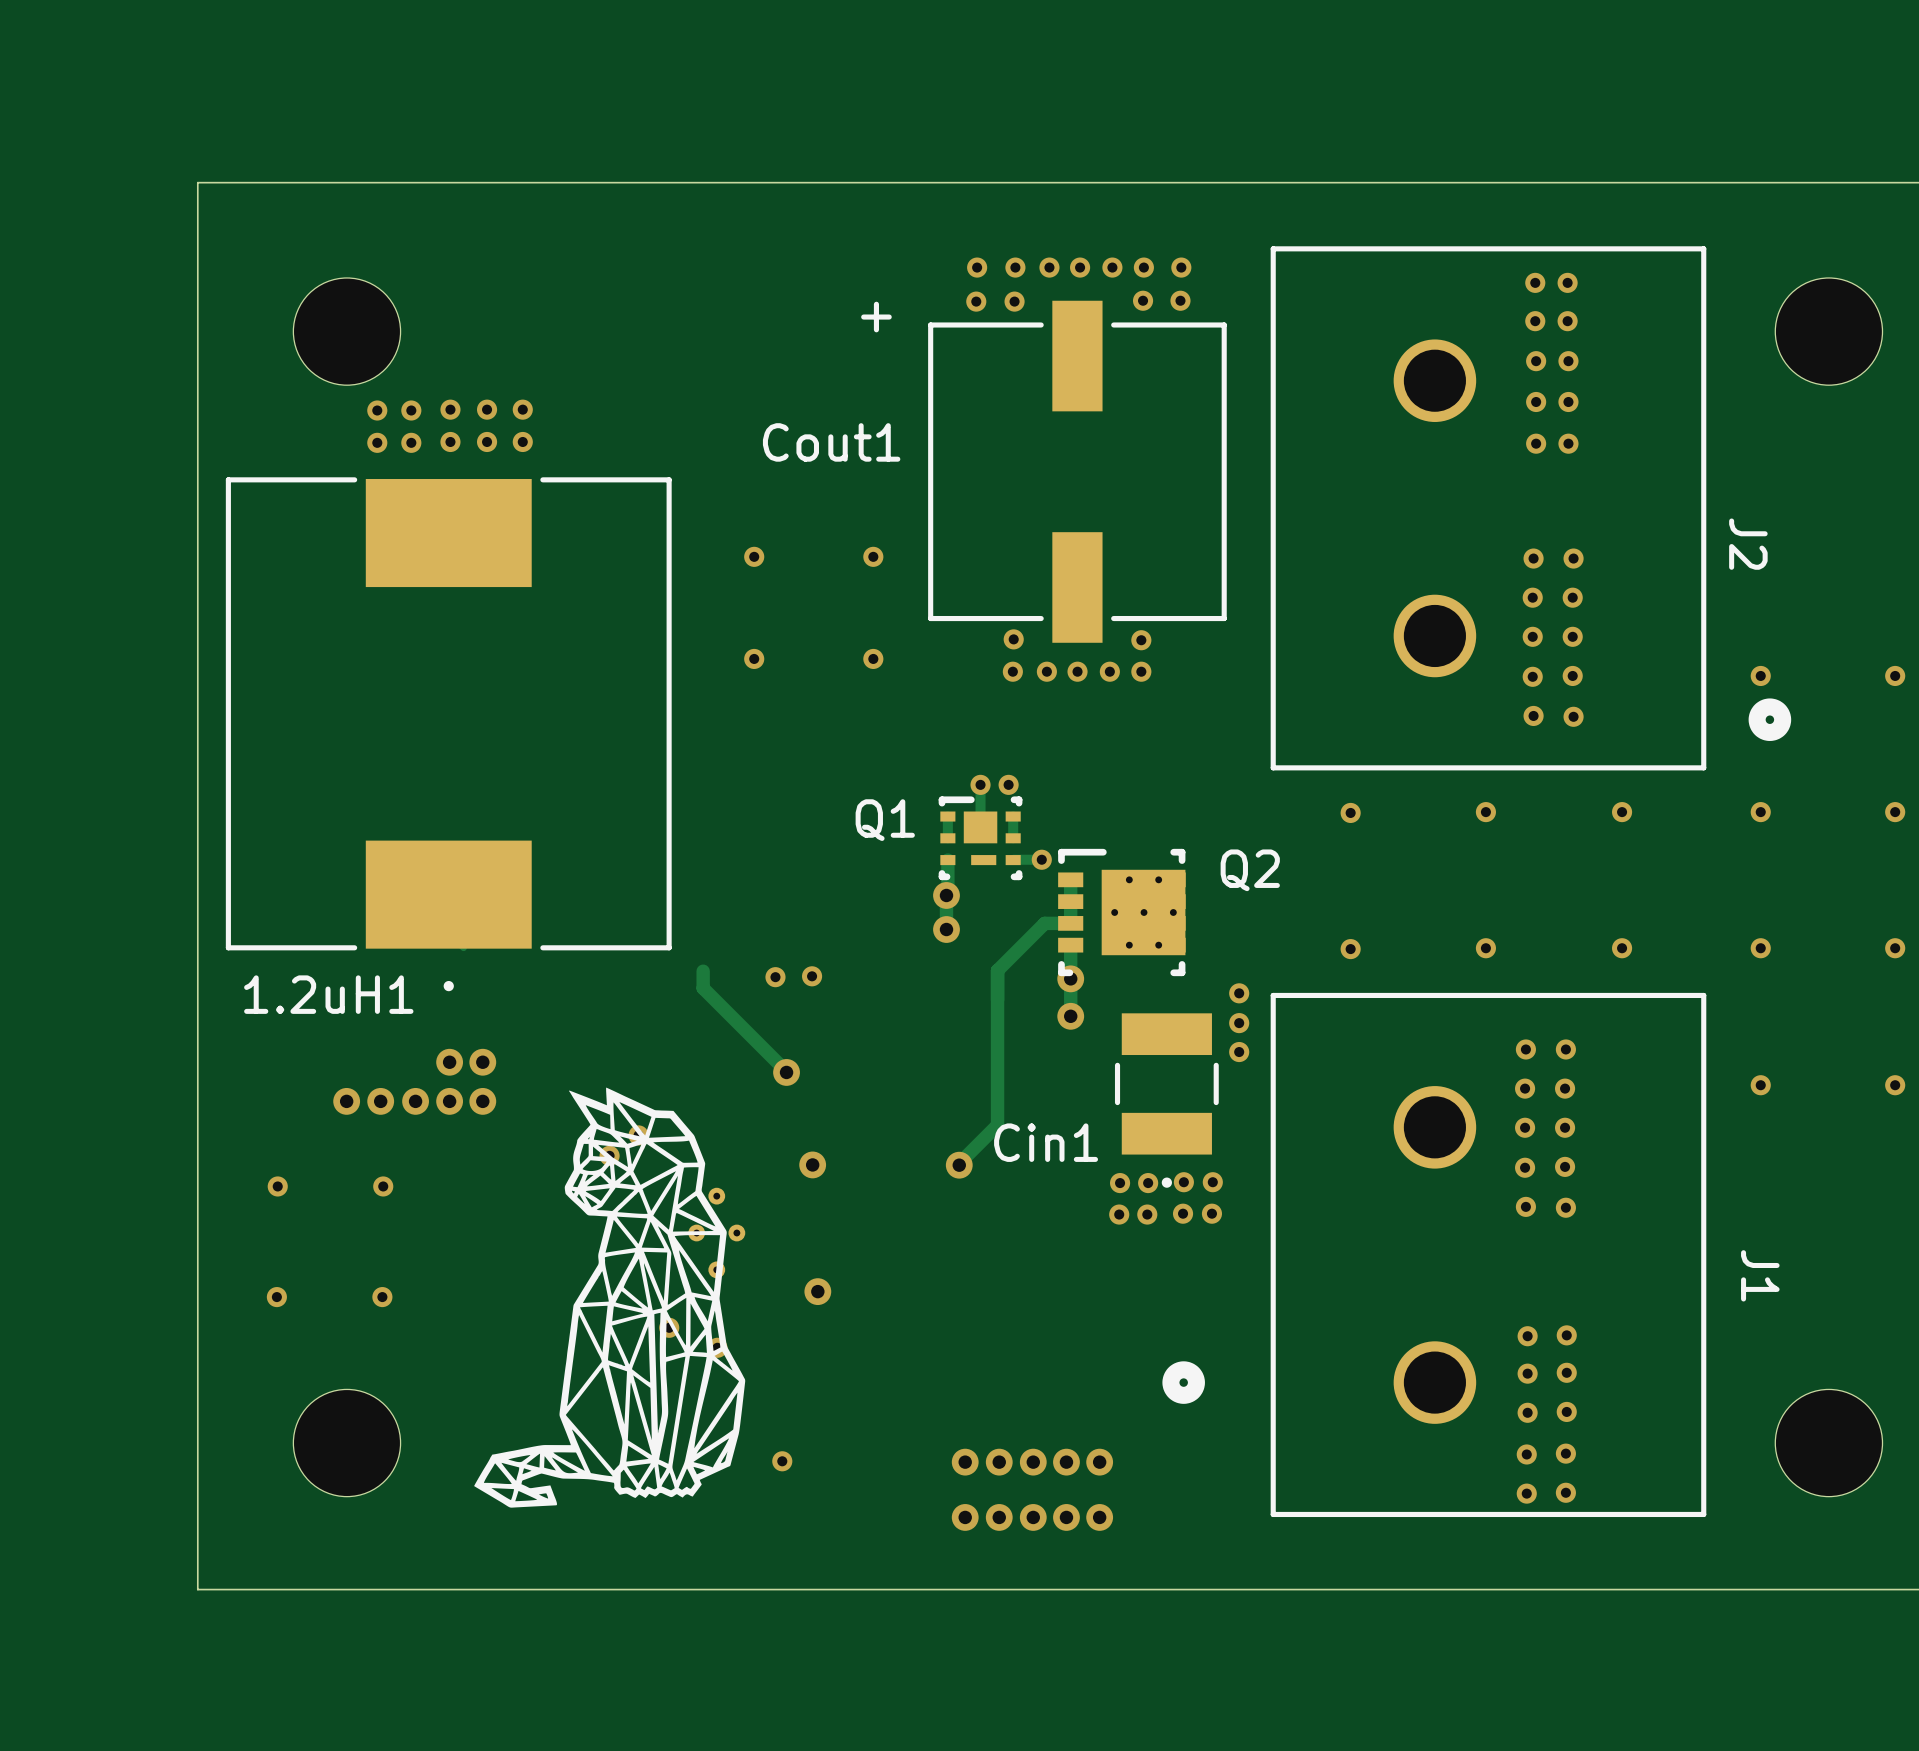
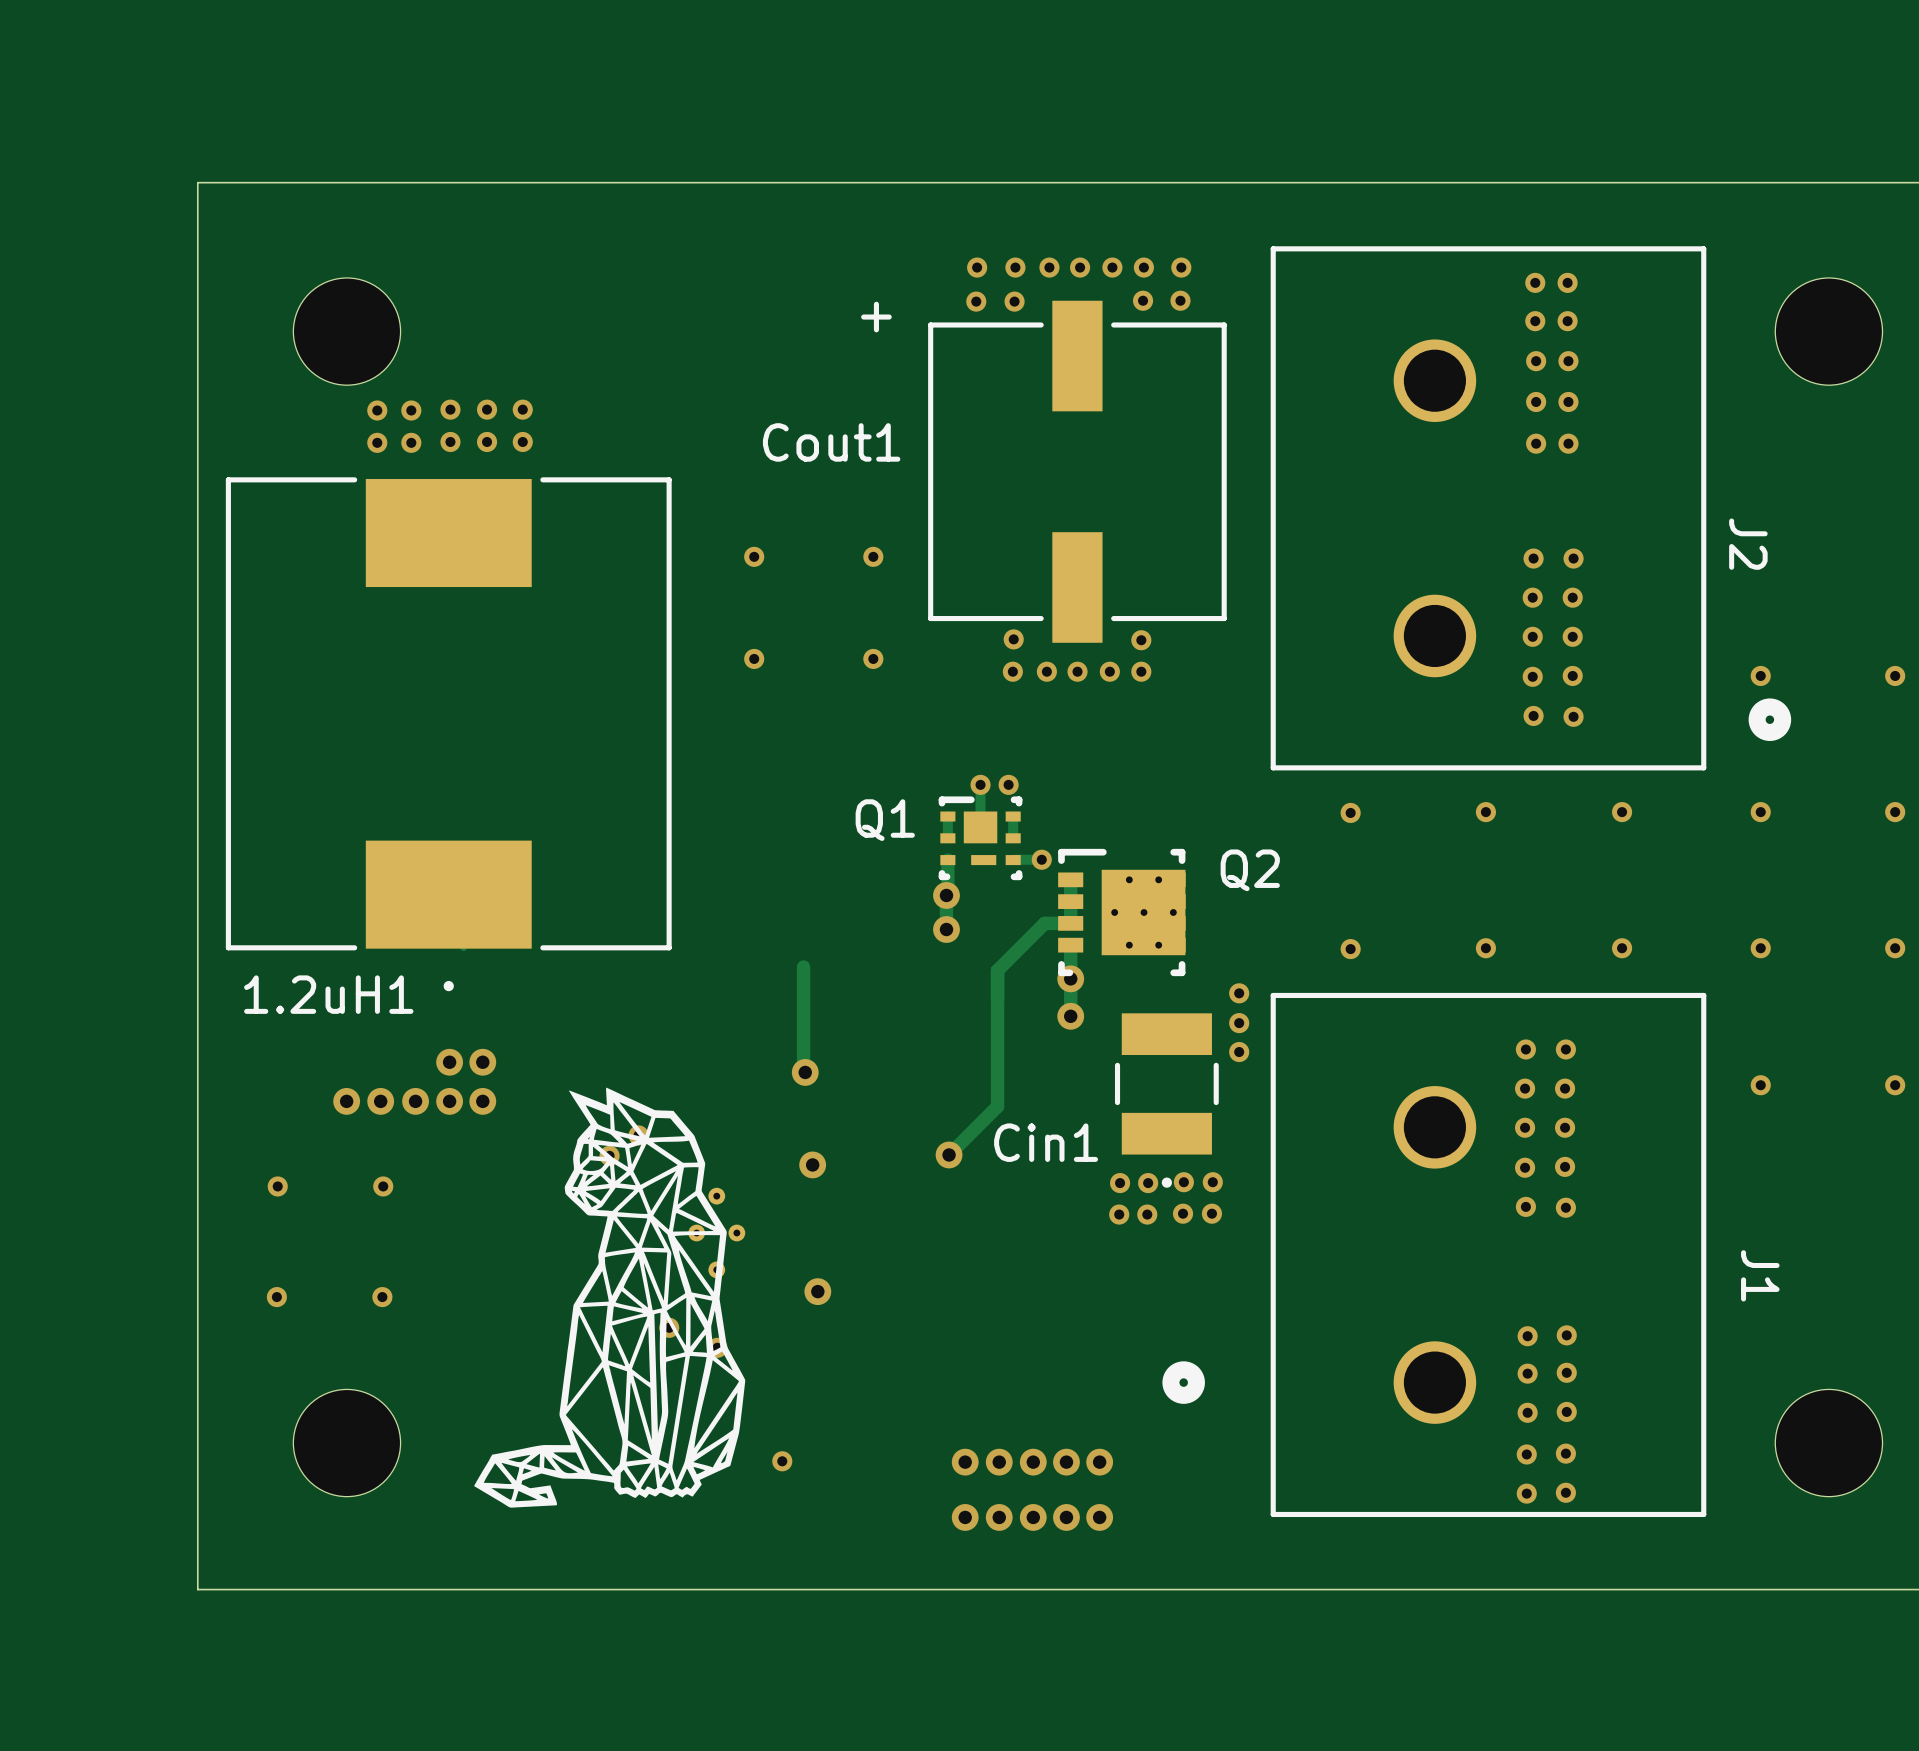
track: none -> (803, 966) (803, 1070) (805, 1072)
track: (703, 971) (703, 988) (786, 1072) -> none
via: (812, 976) -> none
via: (775, 977) -> none
via position: (786, 1072) -> (805, 1072)
track: (997, 1106) (997, 1125) (959, 1165) -> (997, 1106) (949, 1154)
via position: (959, 1165) -> (949, 1154)

